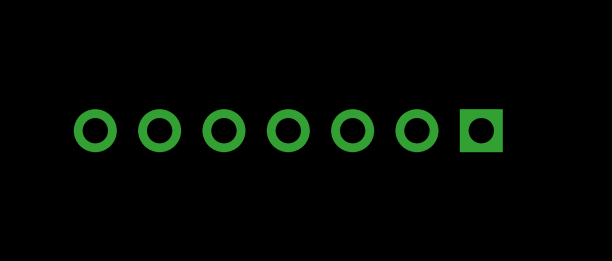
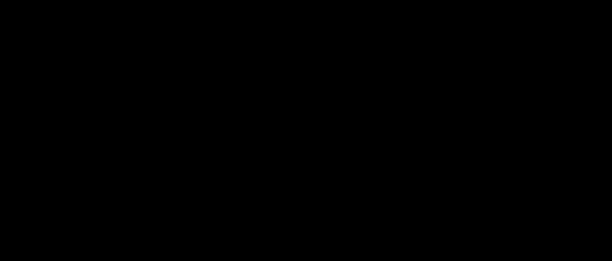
part: (288, 130) -> none

